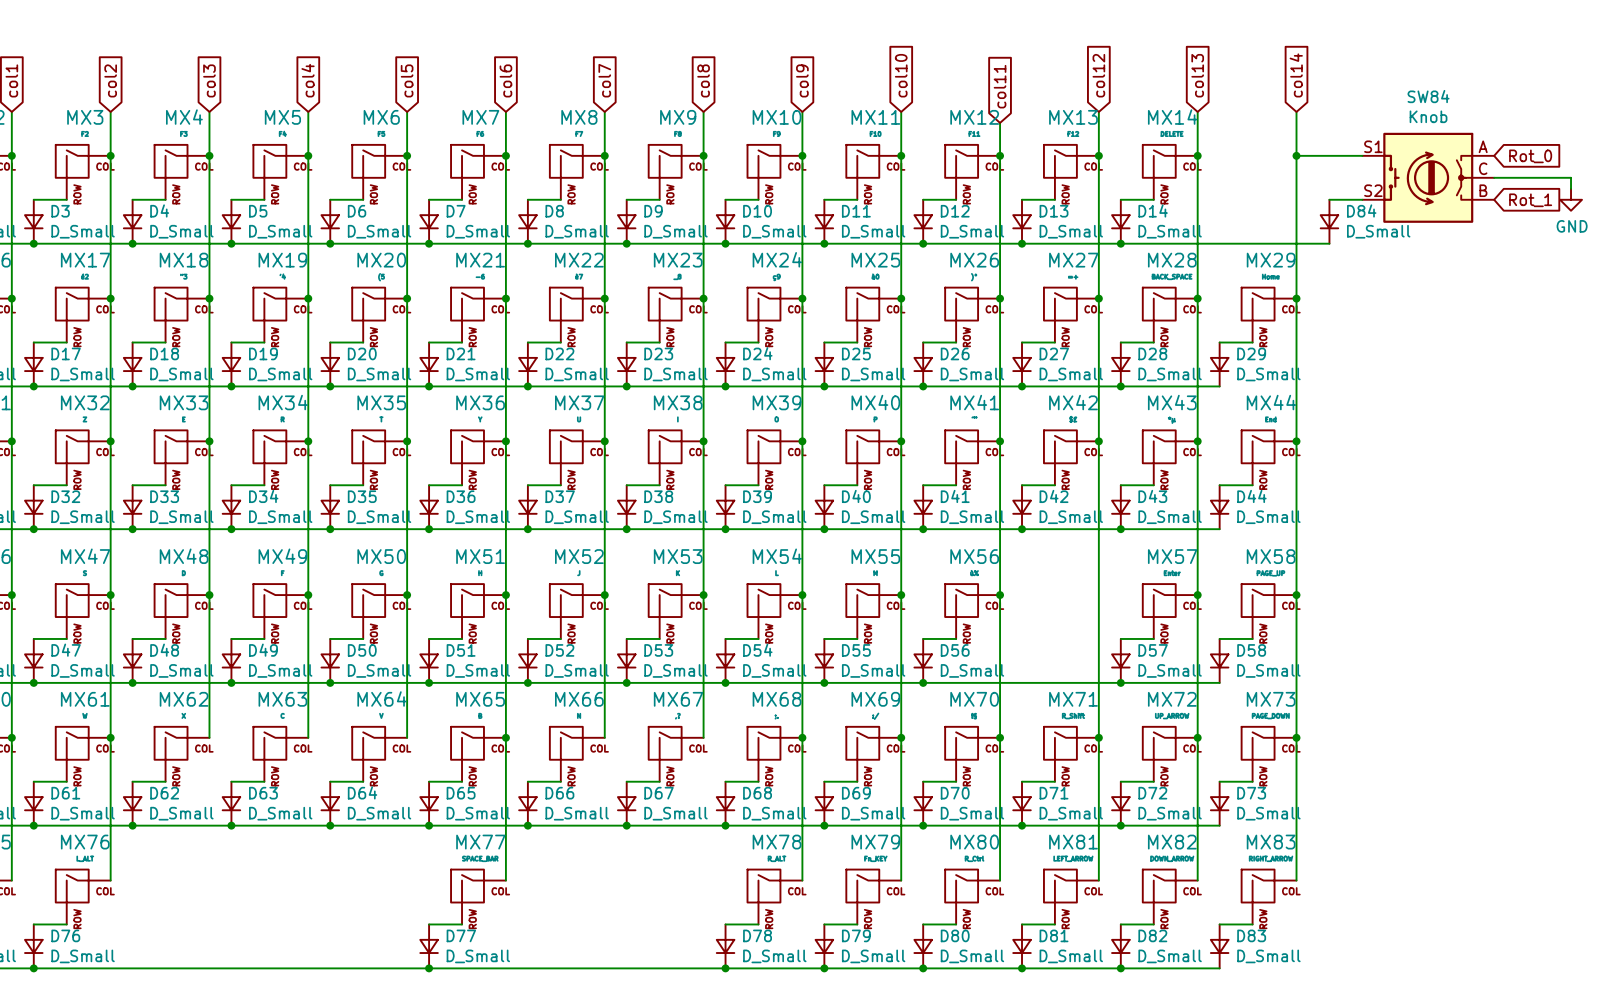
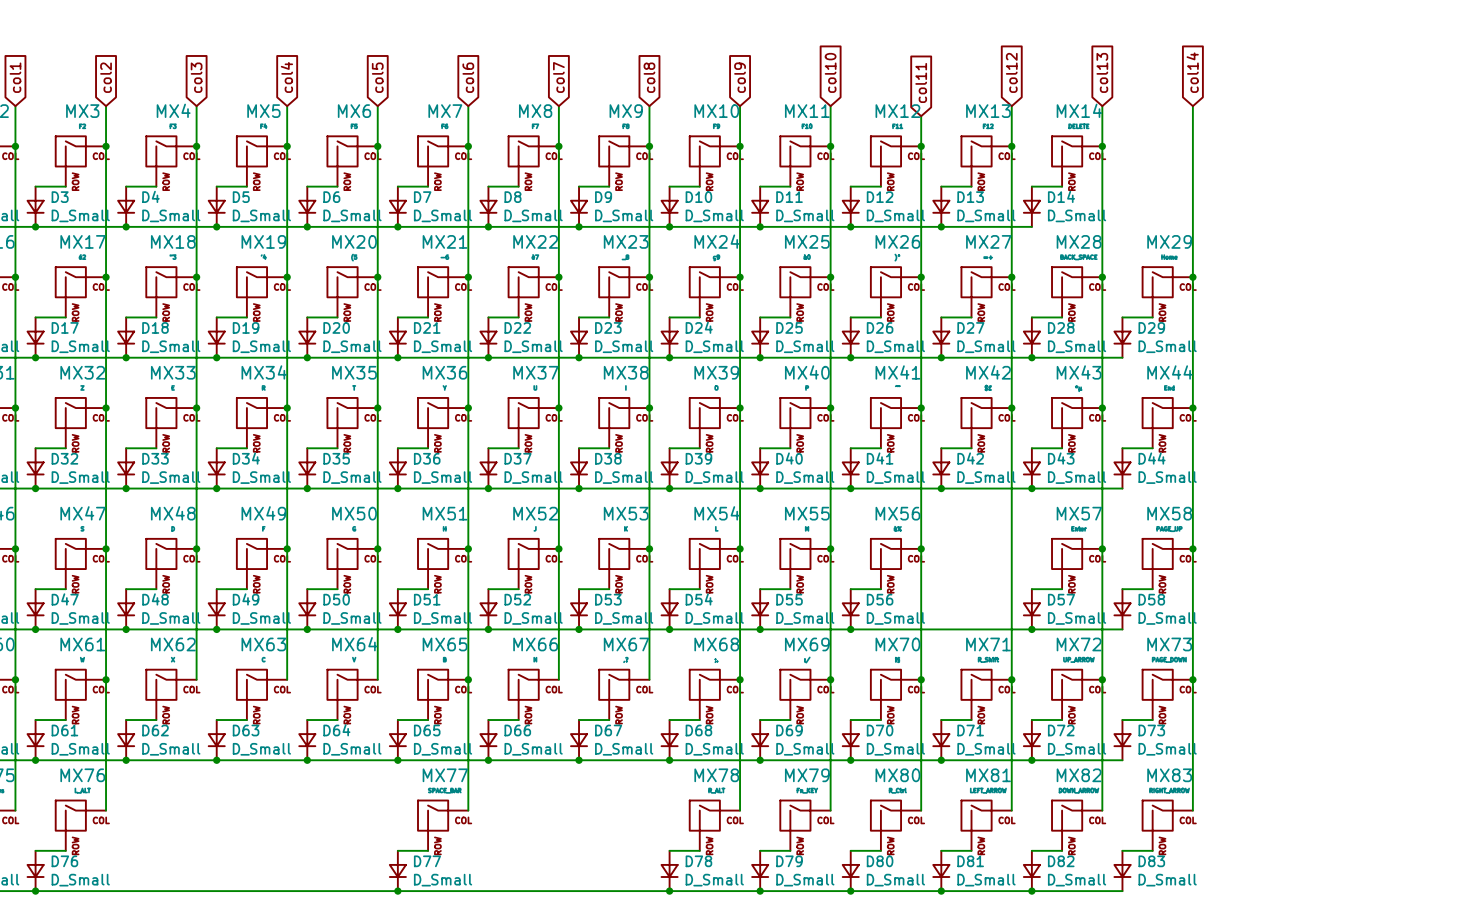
wire: (1296, 155) (1362, 155) -> none
junction: (1296, 155) -> none
global label: Rot_0 (1530, 156) -> none
SW84: Knob (1428, 177) -> none
wire: (1494, 177) (1571, 177) (1571, 188) -> none
wire: (1329, 199) (1362, 199) -> none
power symbol: GND (1571, 199) -> none
global label: Rot_1 (1530, 200) -> none
D84: D_Small (1329, 221) -> none
wire: (1120, 243) (1329, 243) -> none
junction: (1120, 243) -> none

